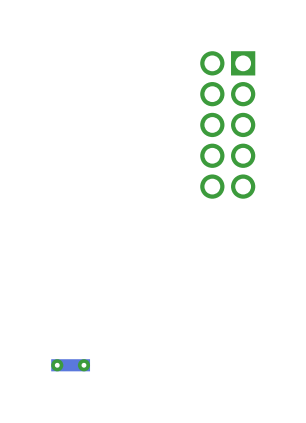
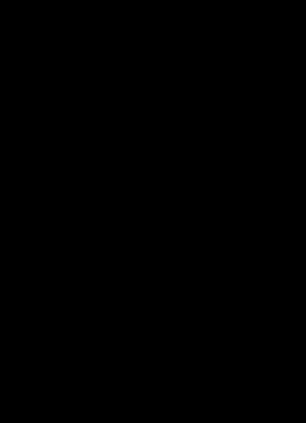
part: (227, 124) -> none
part: (70, 365) -> none

